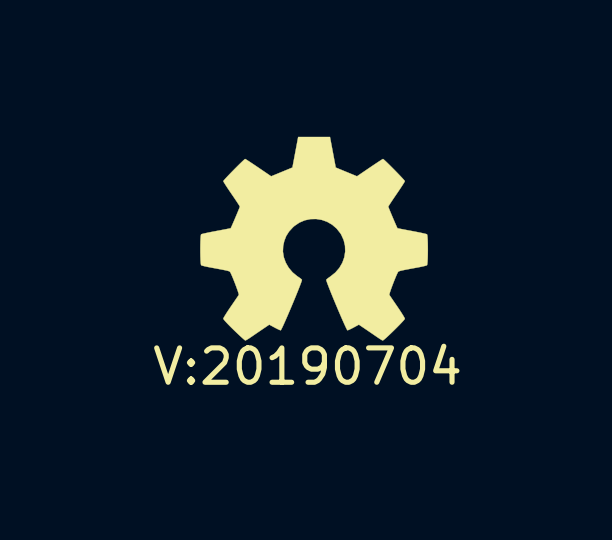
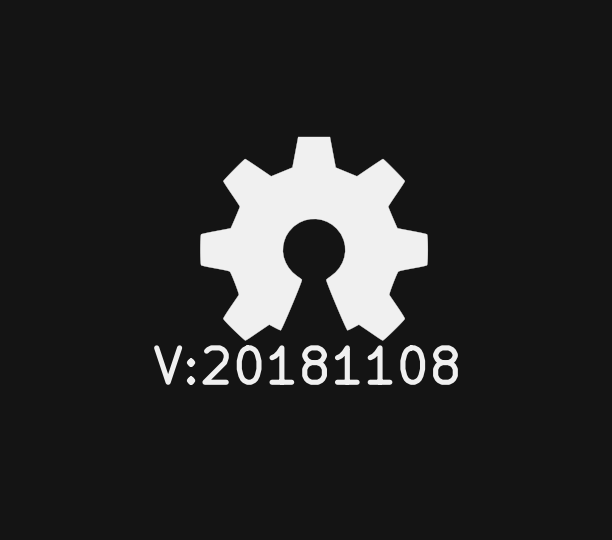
drawing shape: [154, 343, 460, 385] -> [154, 345, 458, 385]

